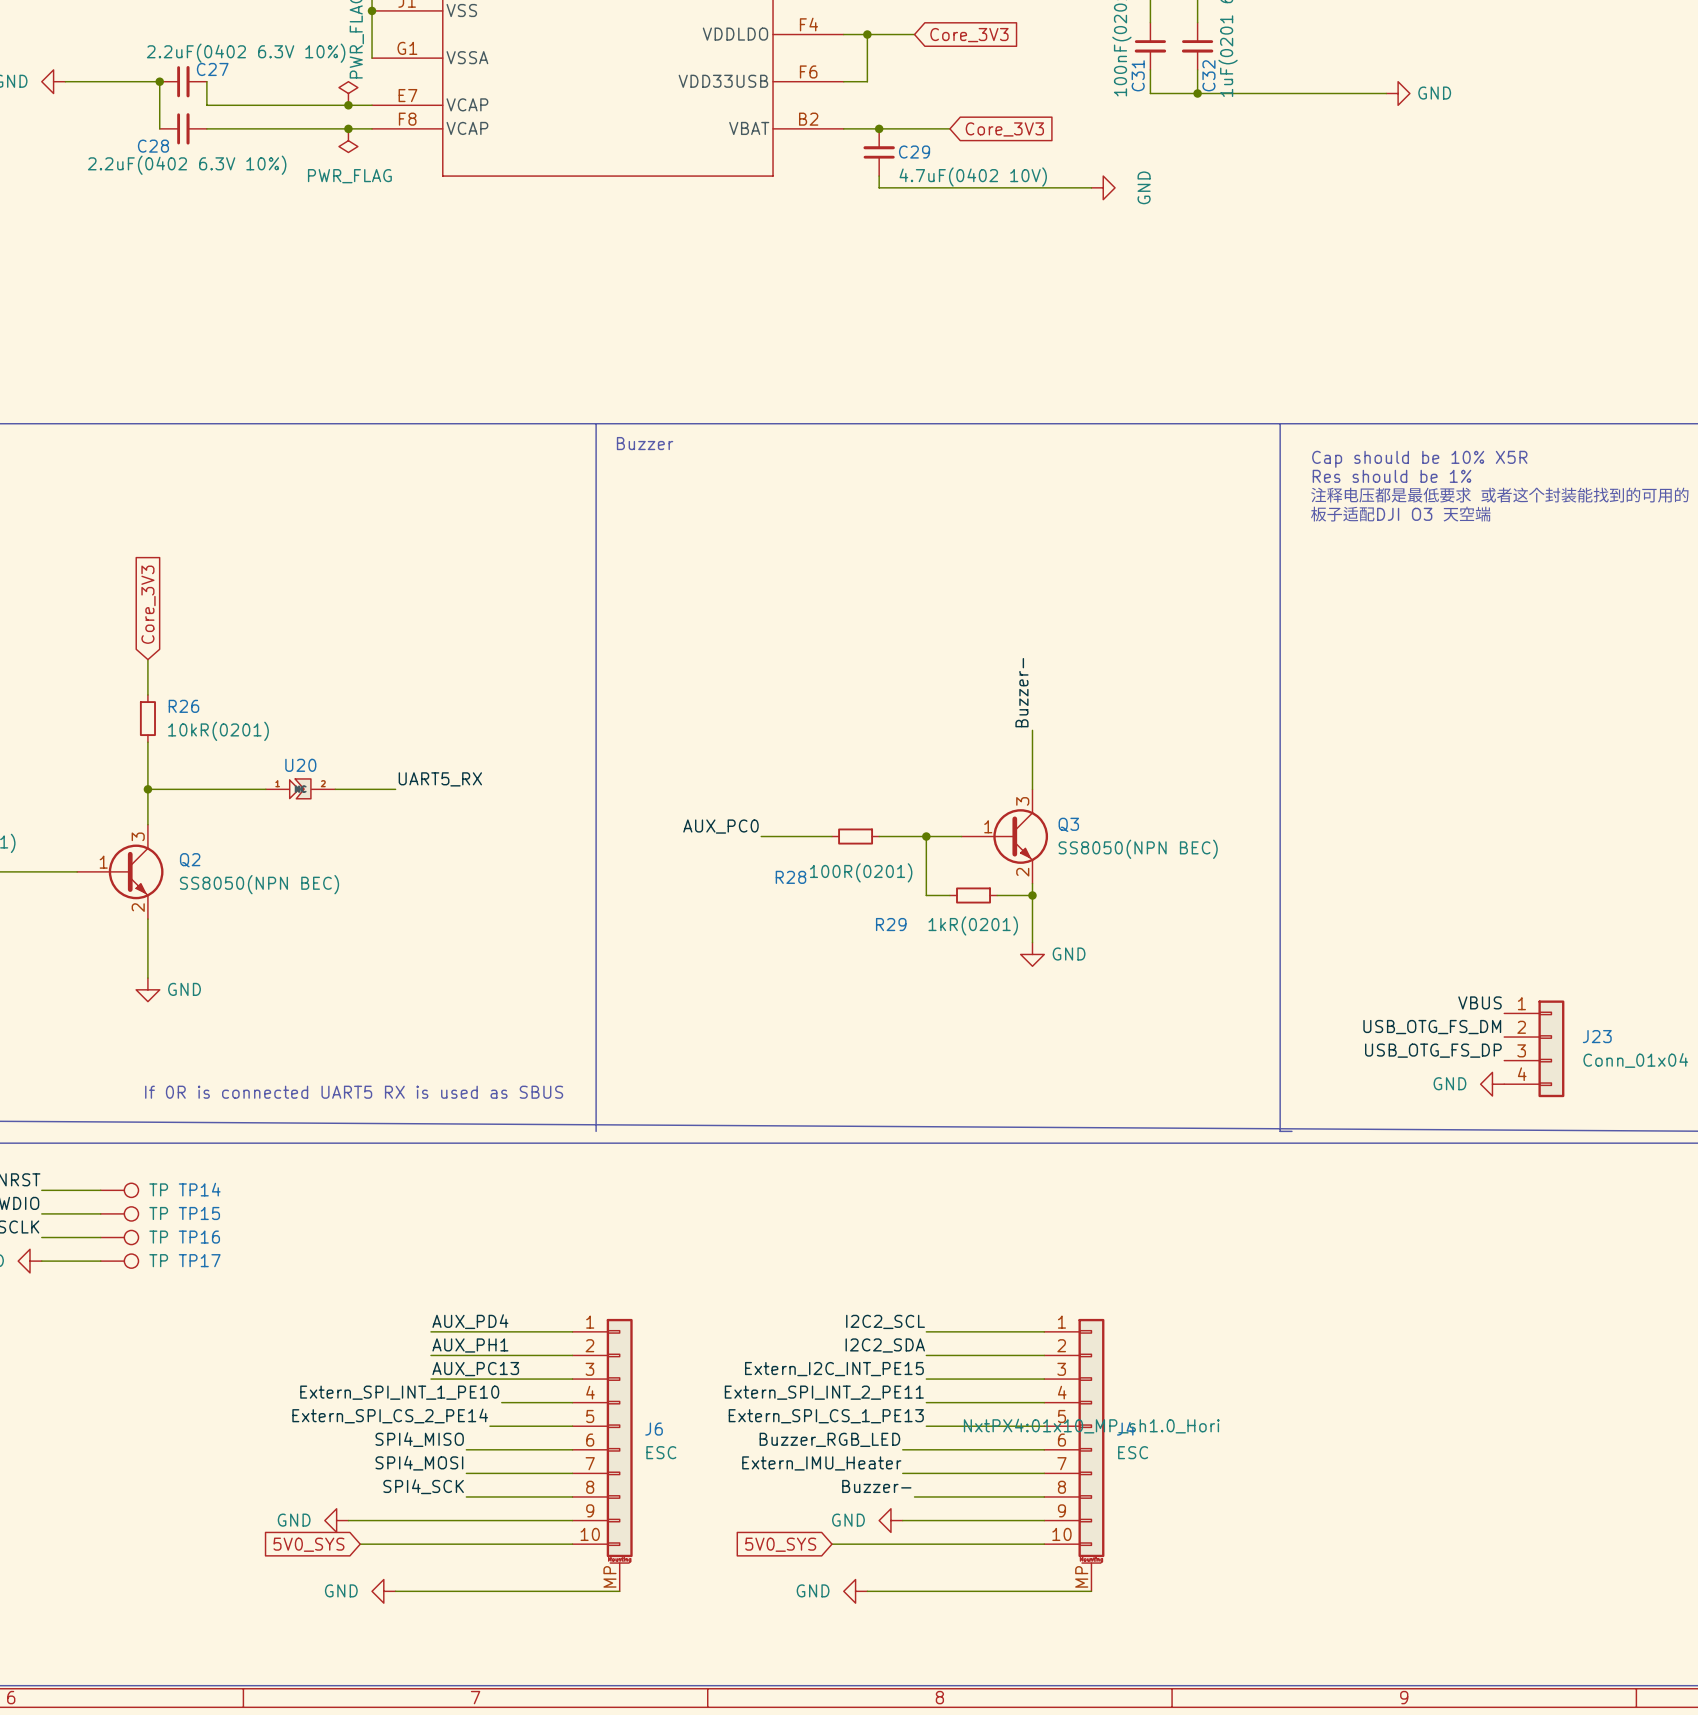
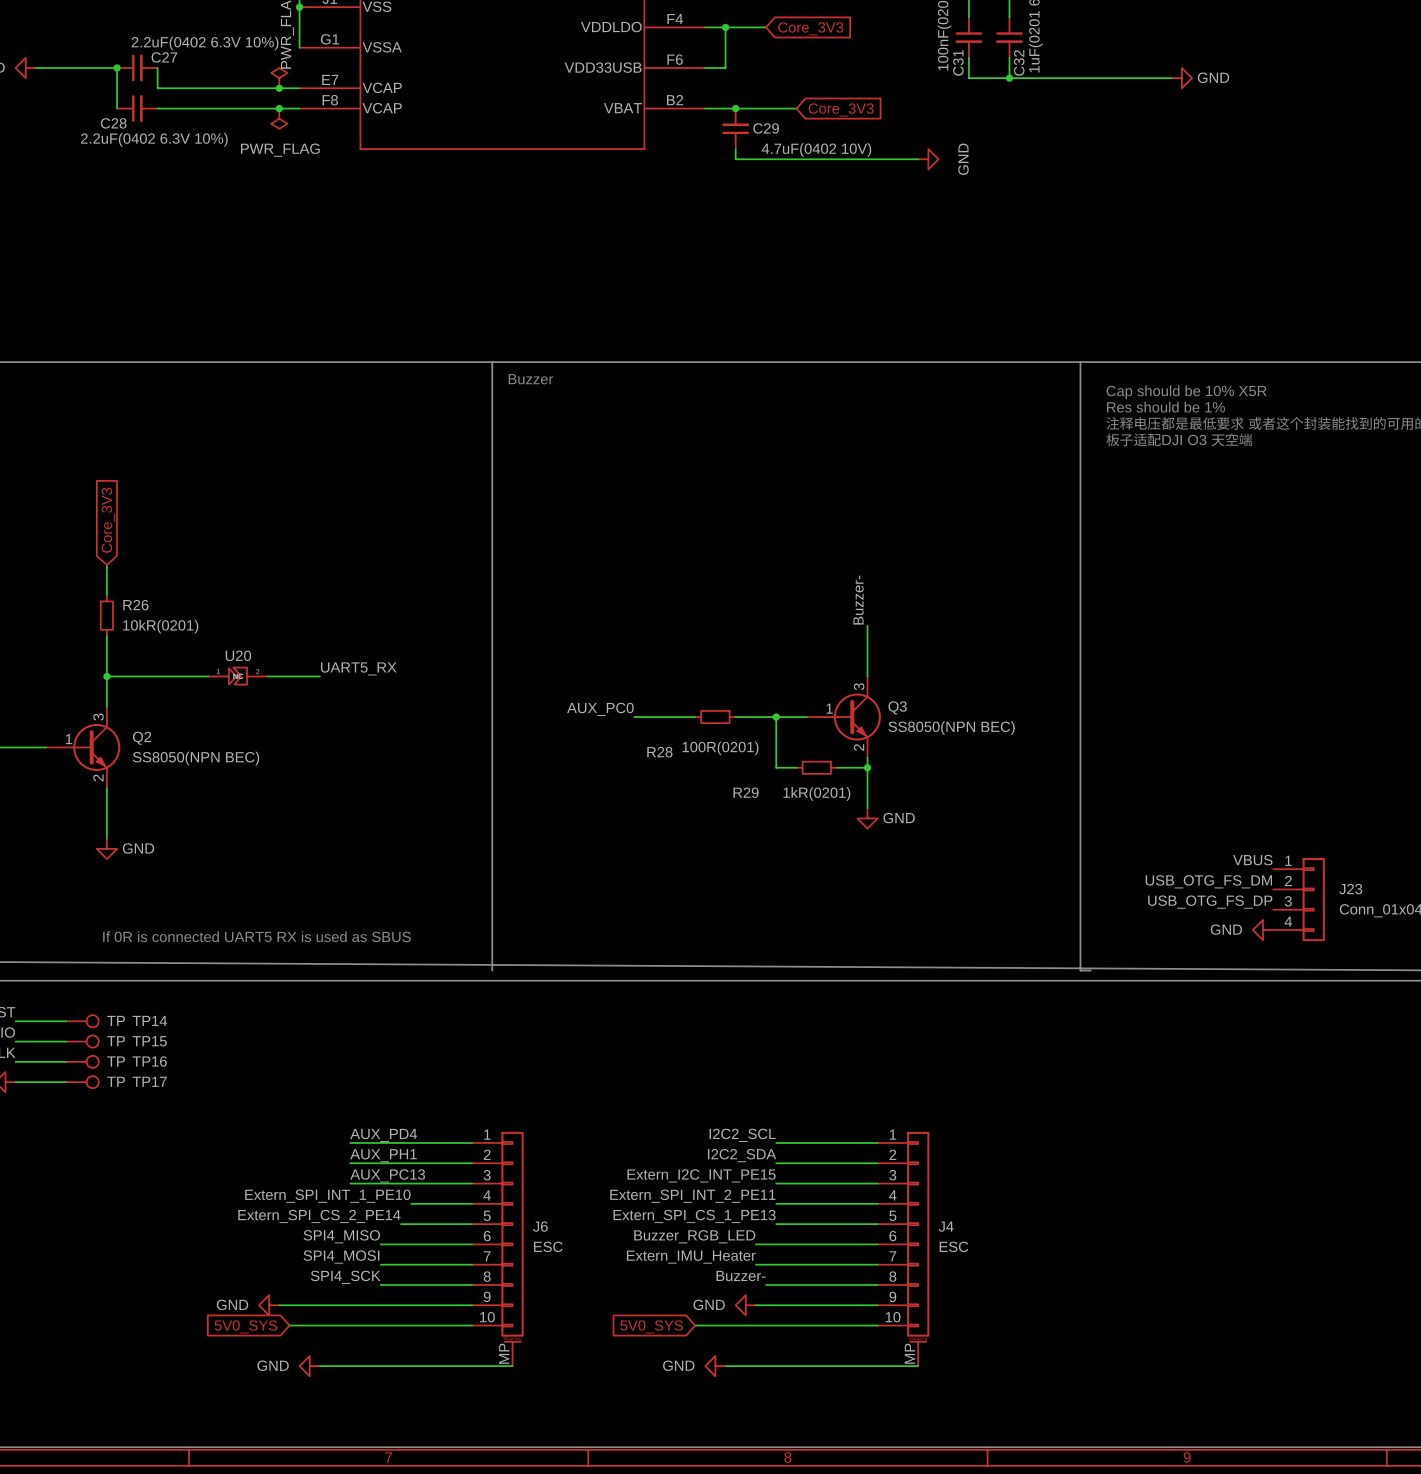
J4 text: NxtPX4:01x10_MP_sh1.0_Hori (1091, 1426) -> none

